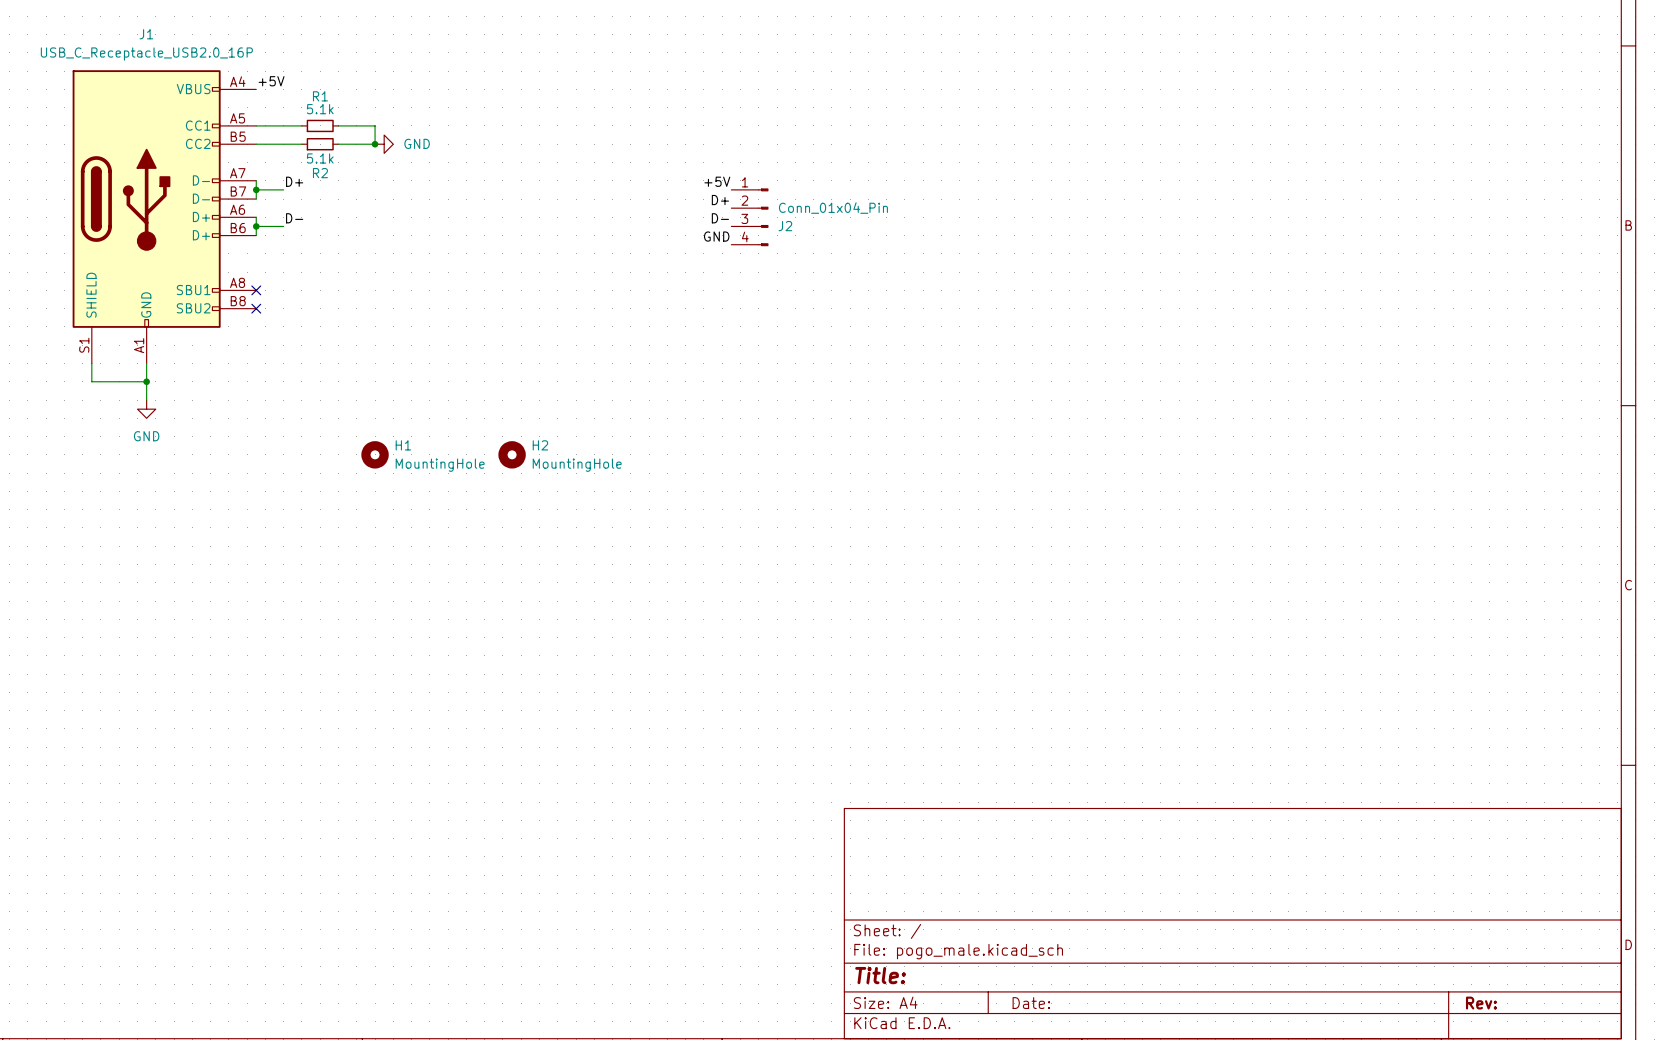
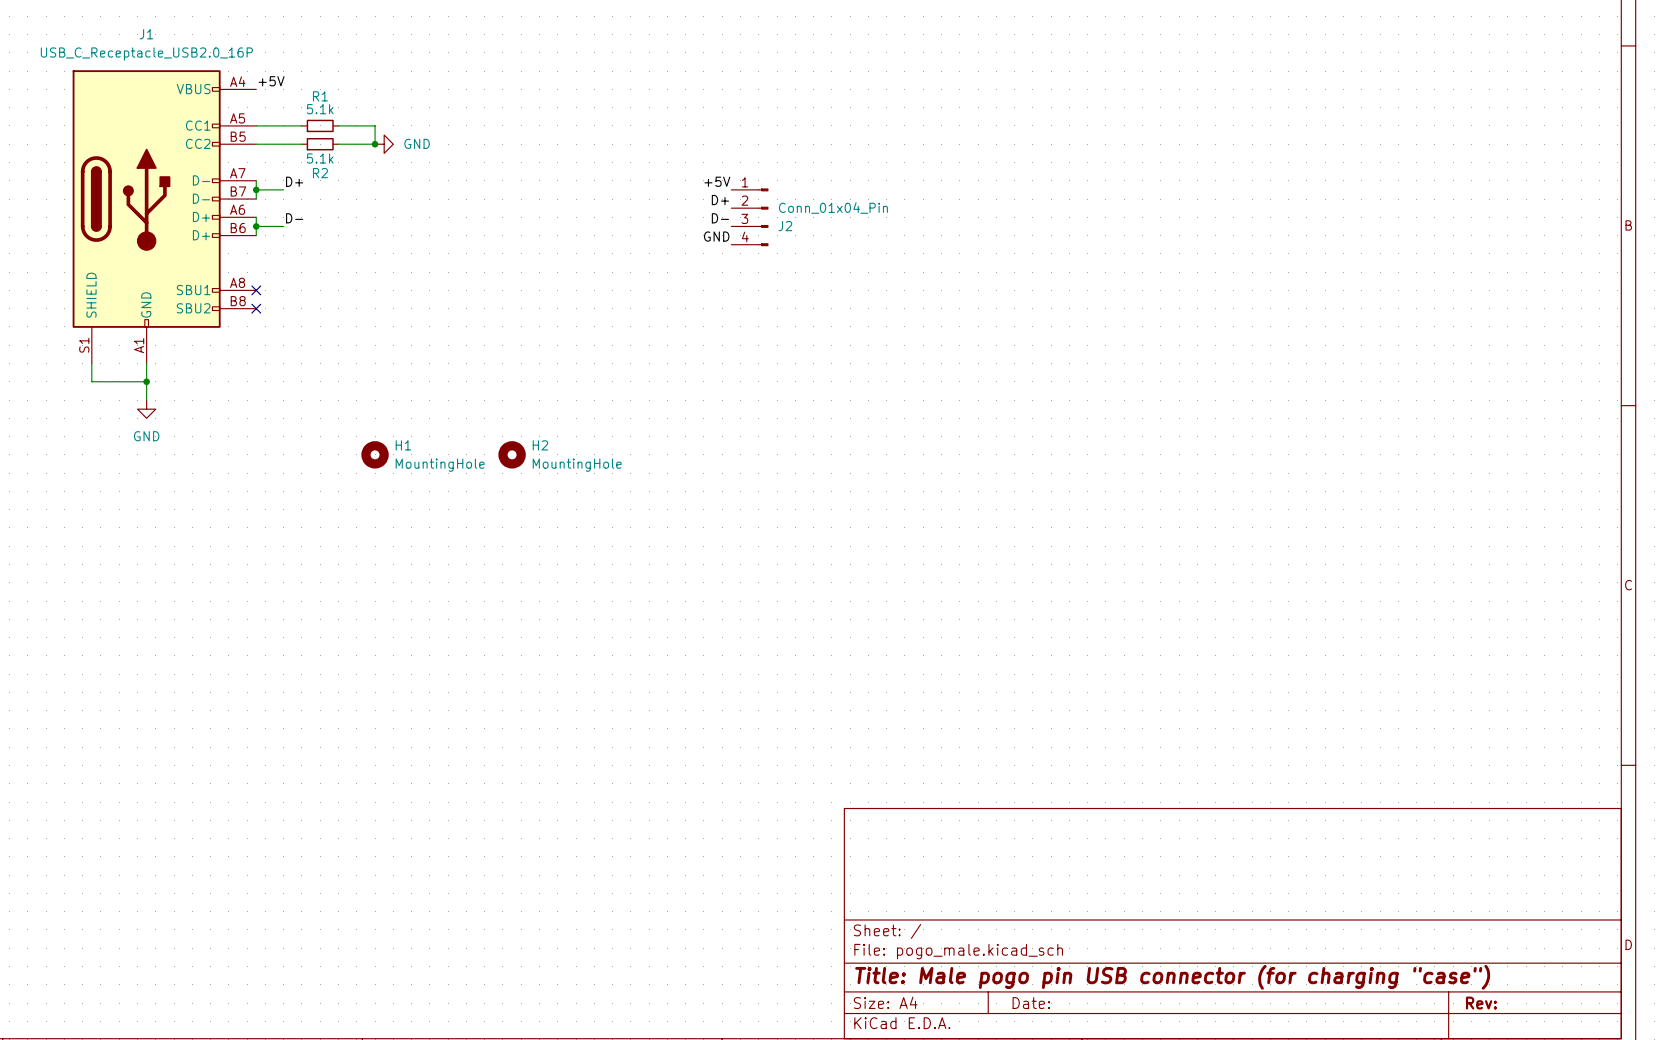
title block: Title: (880, 975) -> Title: Male pogo pin USB connector (for charging "case") (1172, 977)

